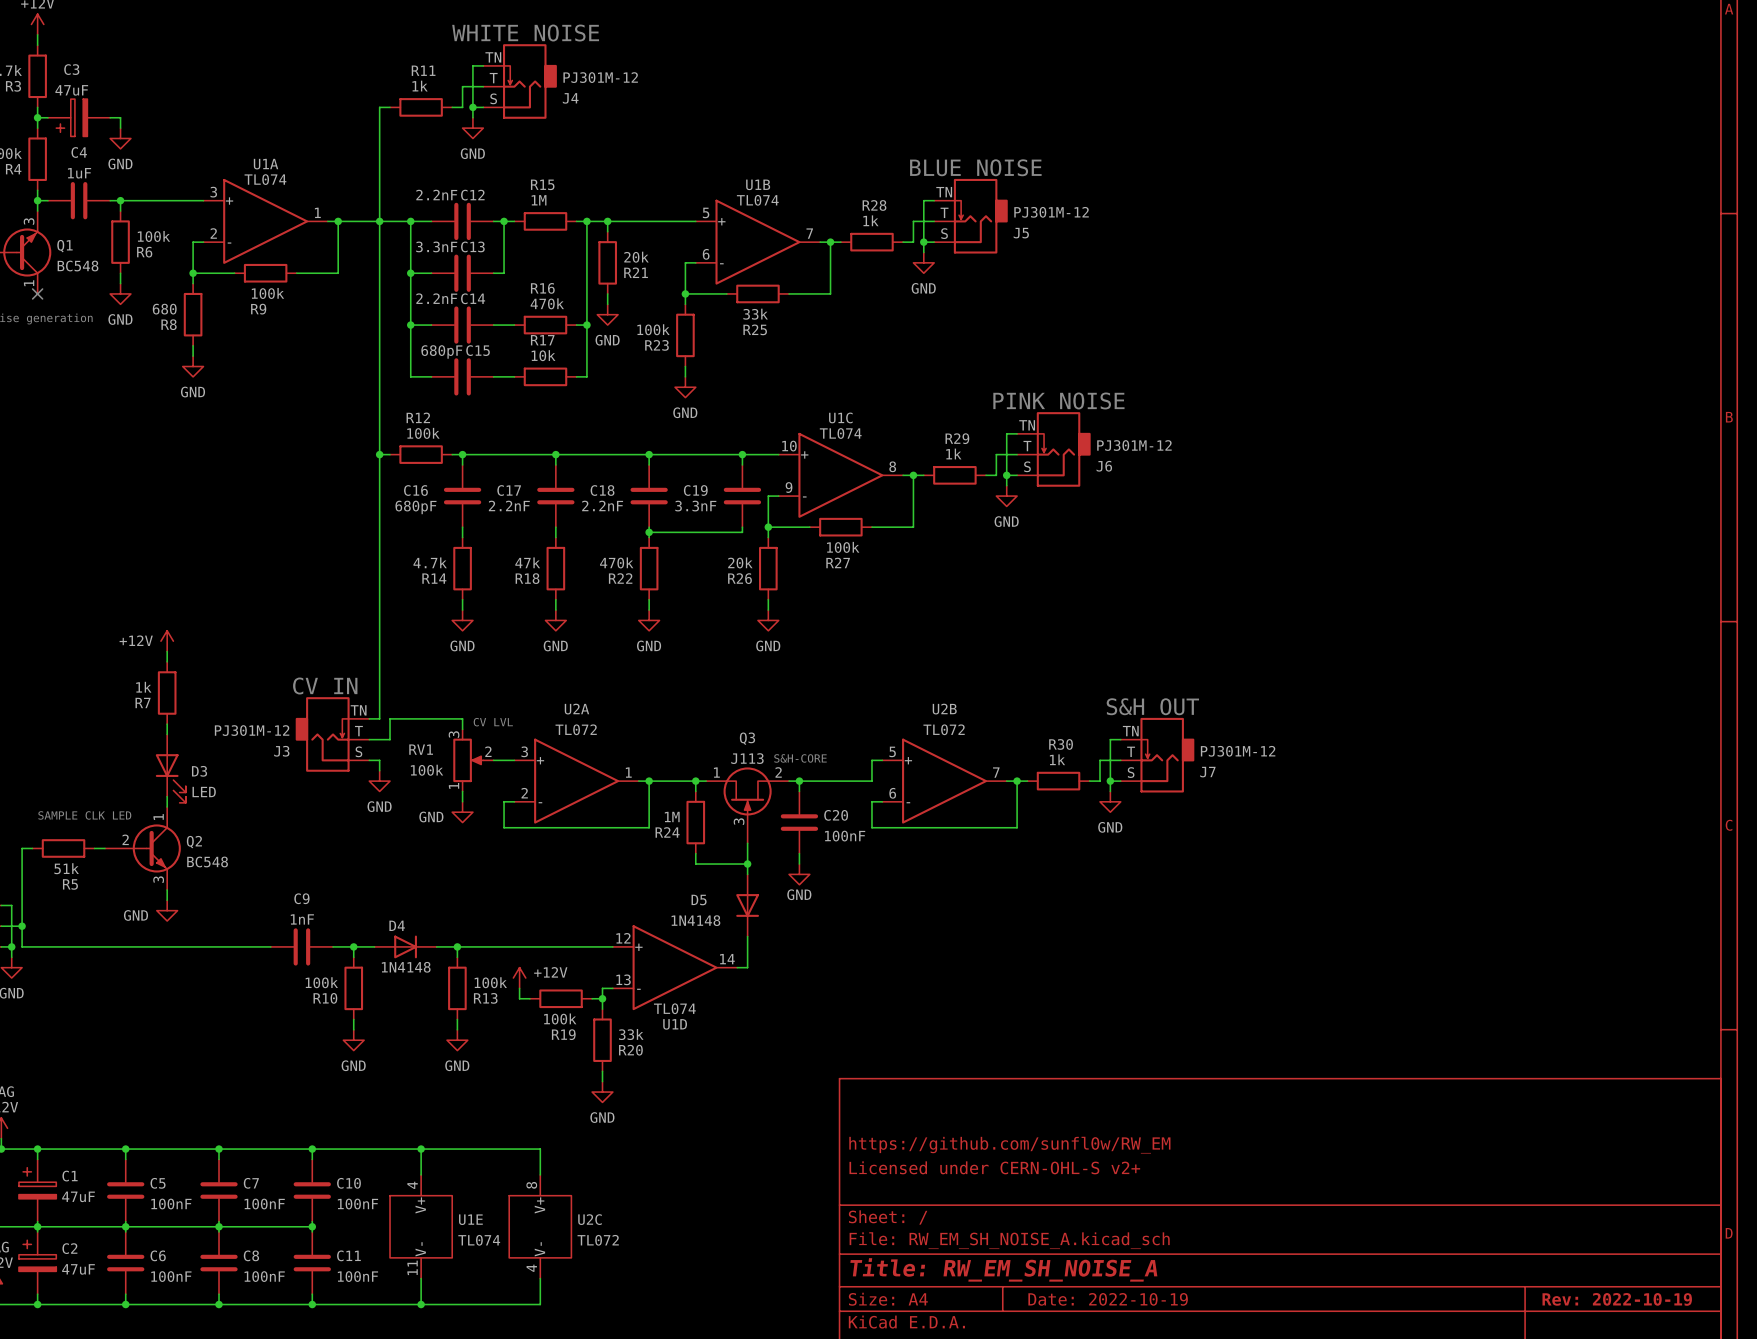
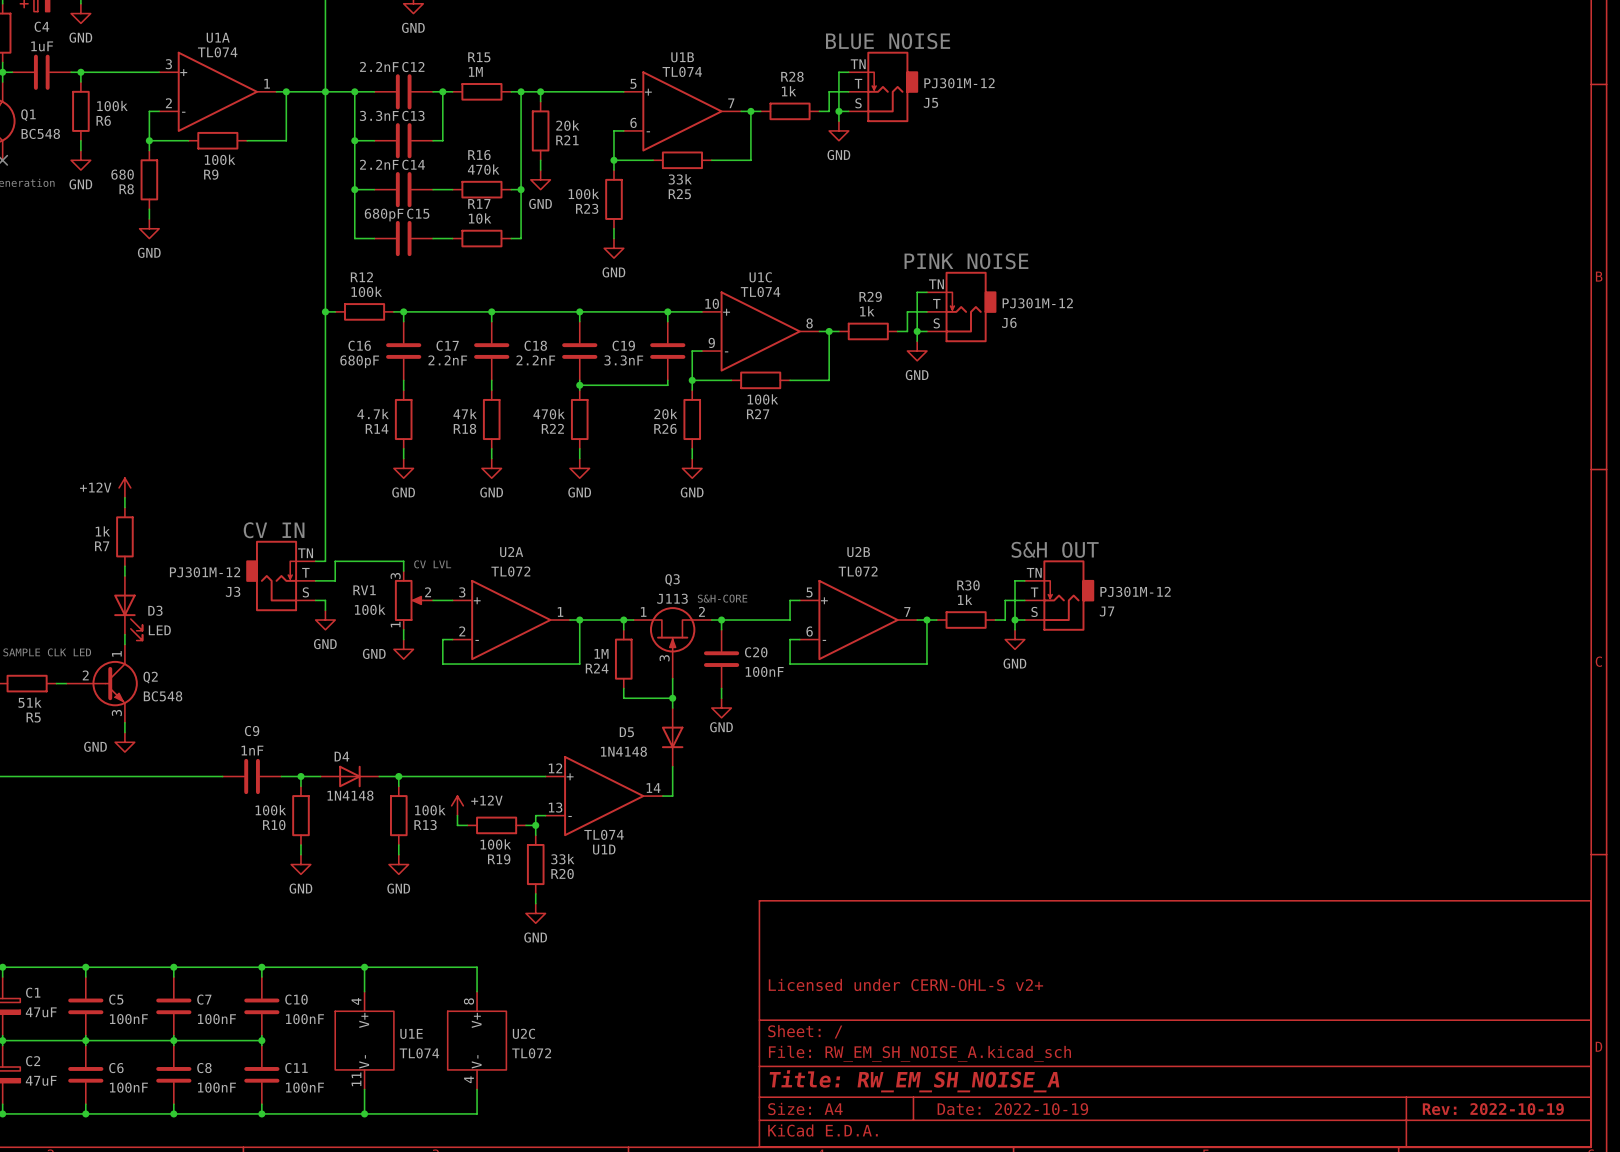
title block: https://github.com/sunfl0w/RW_EM (1009, 1145) -> none

